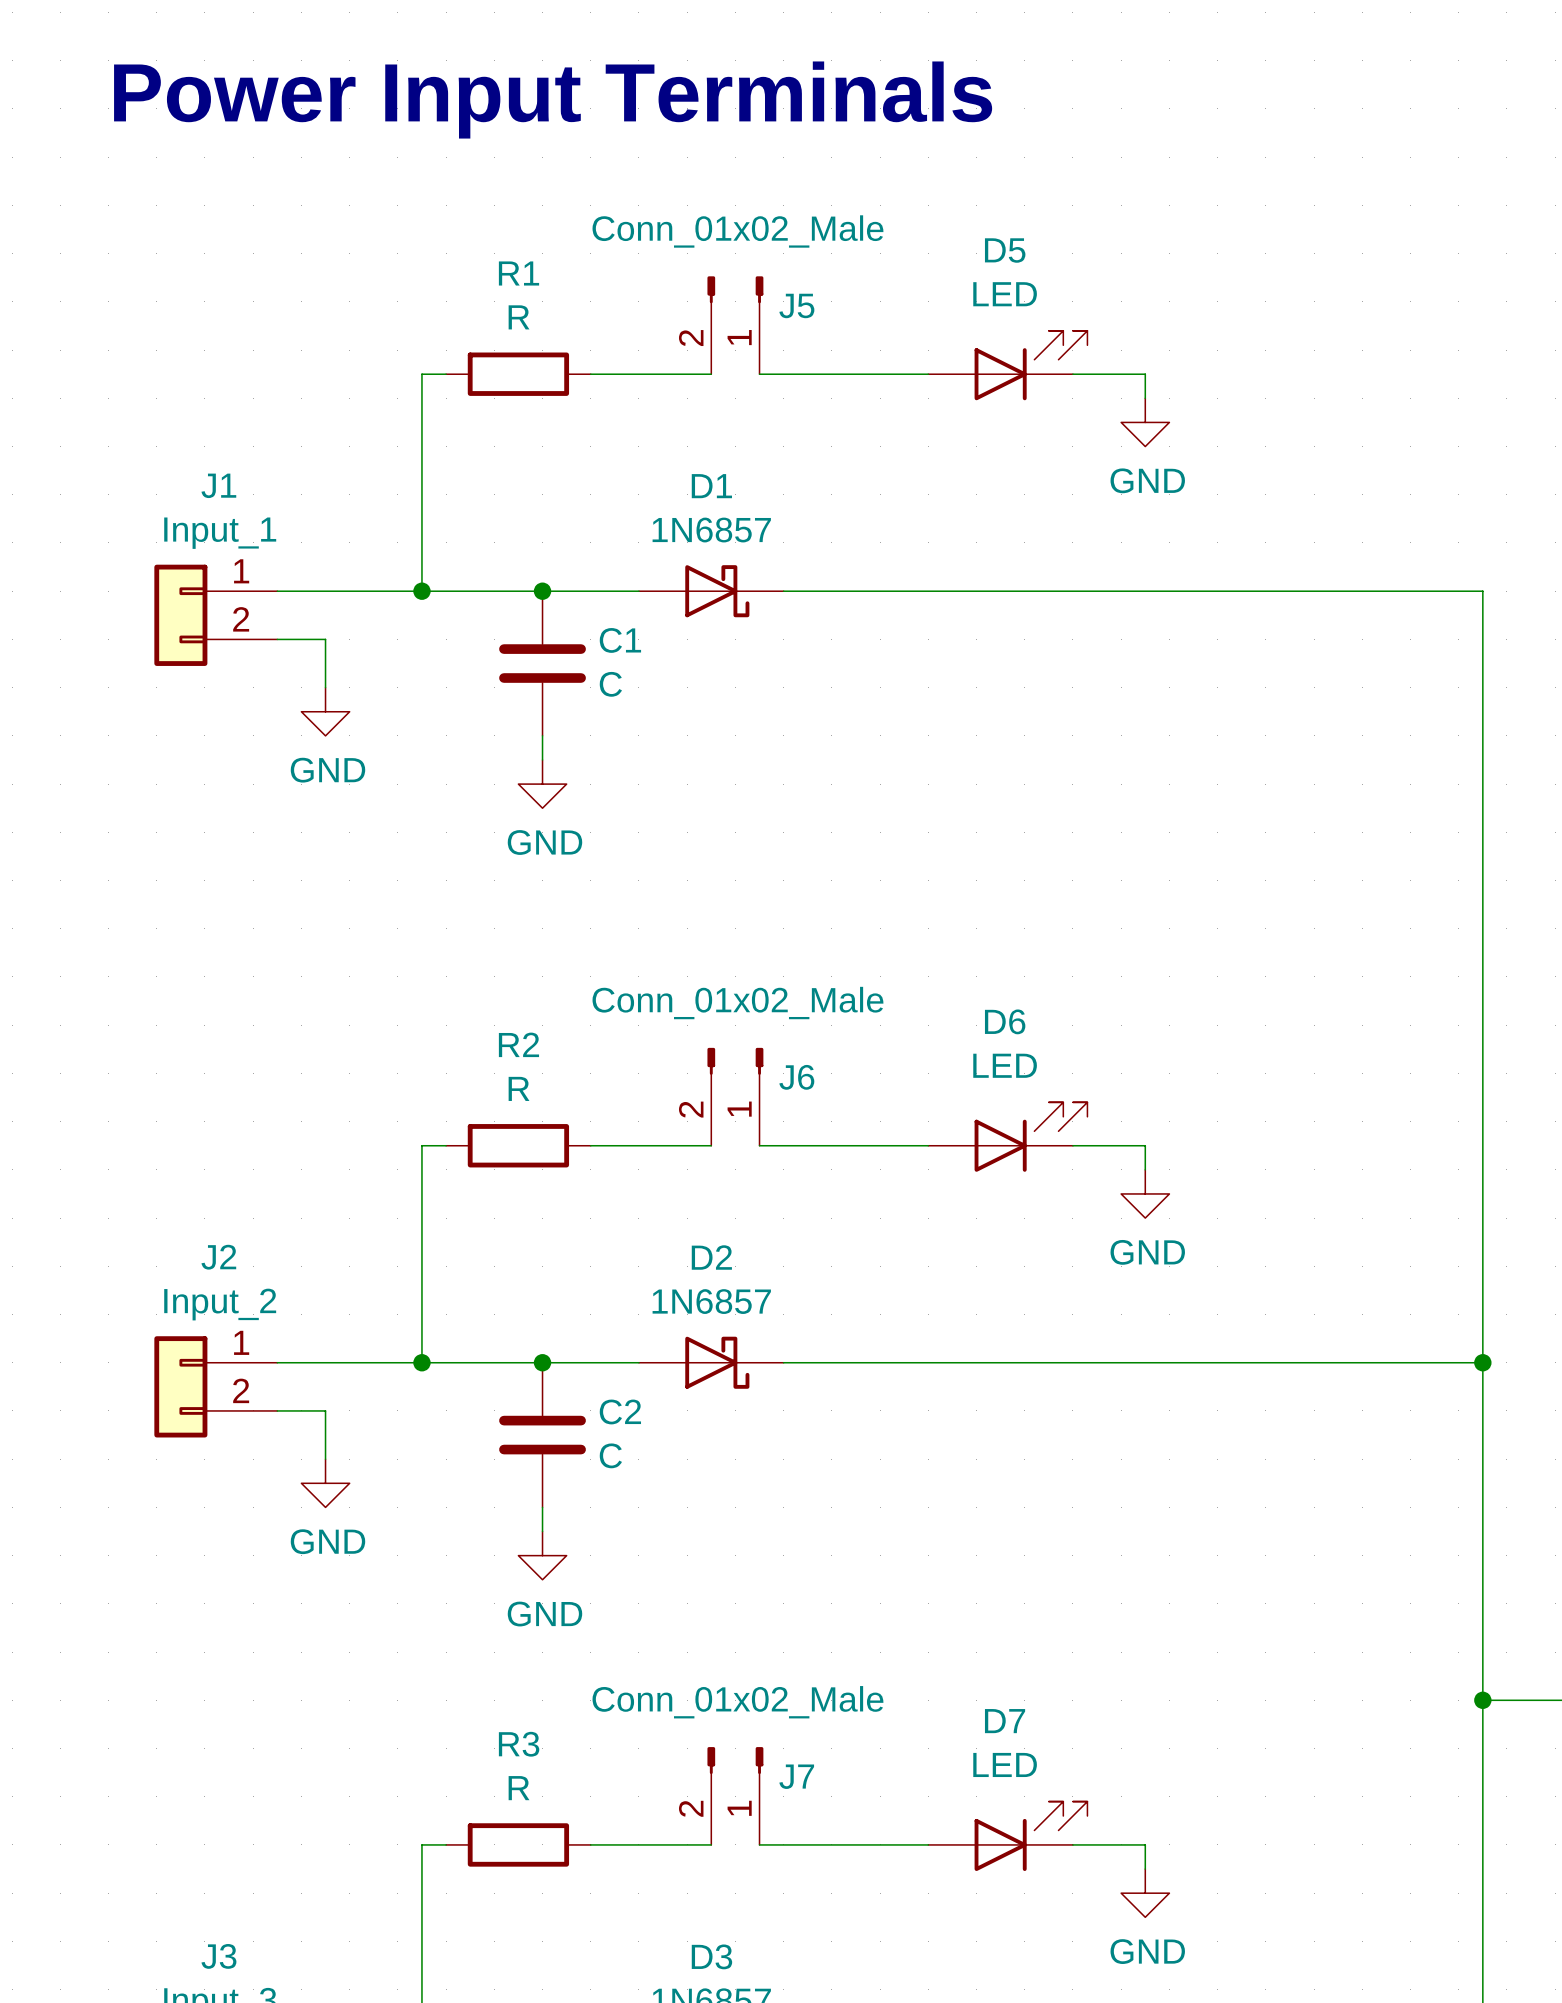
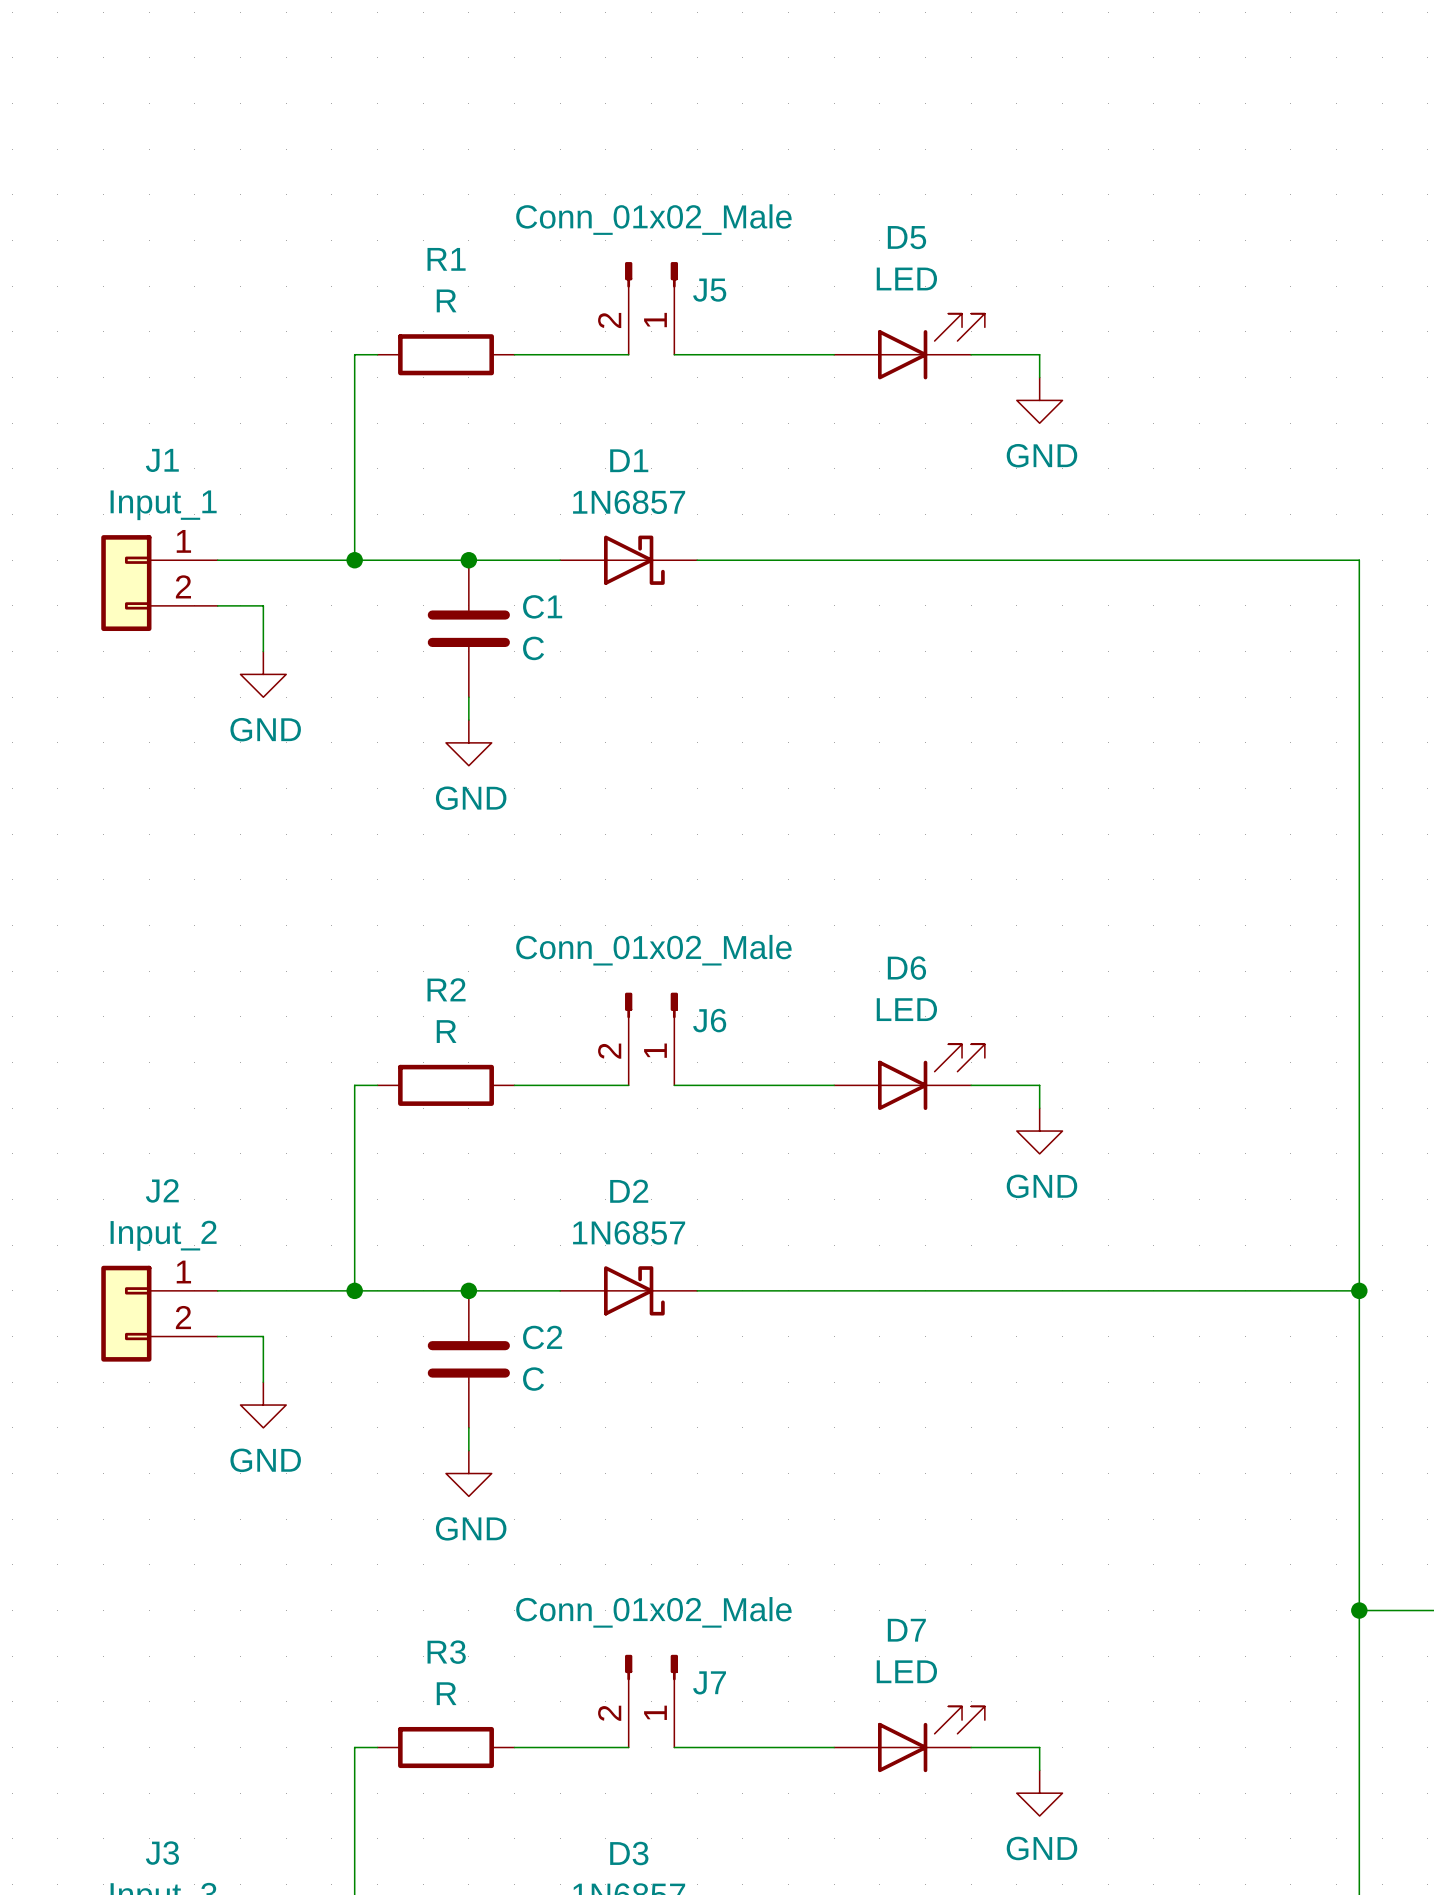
text: Power Input Terminals (553, 100) -> none

